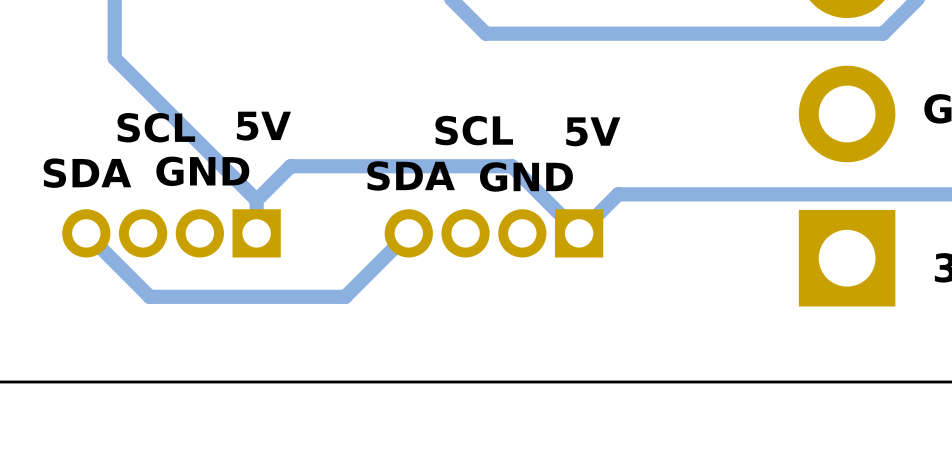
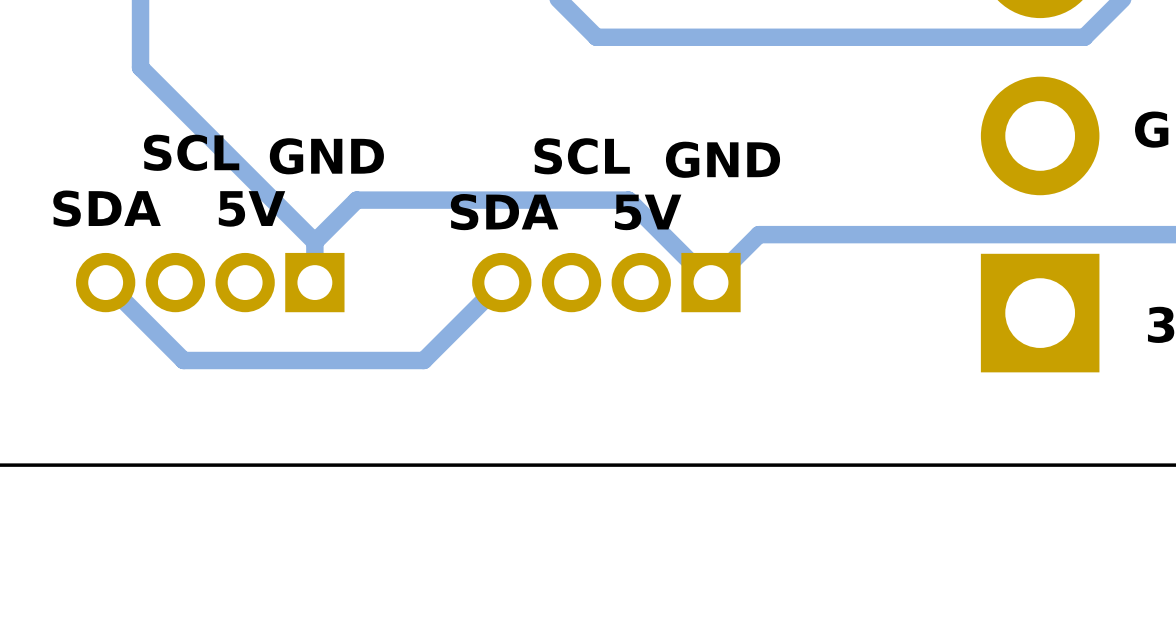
text position: 5V (263, 126) -> 5V (252, 208)
text position: 5V (593, 131) -> 5V (648, 212)
text position: GND (202, 171) -> GND (326, 156)
text position: GND (526, 176) -> GND (723, 159)

